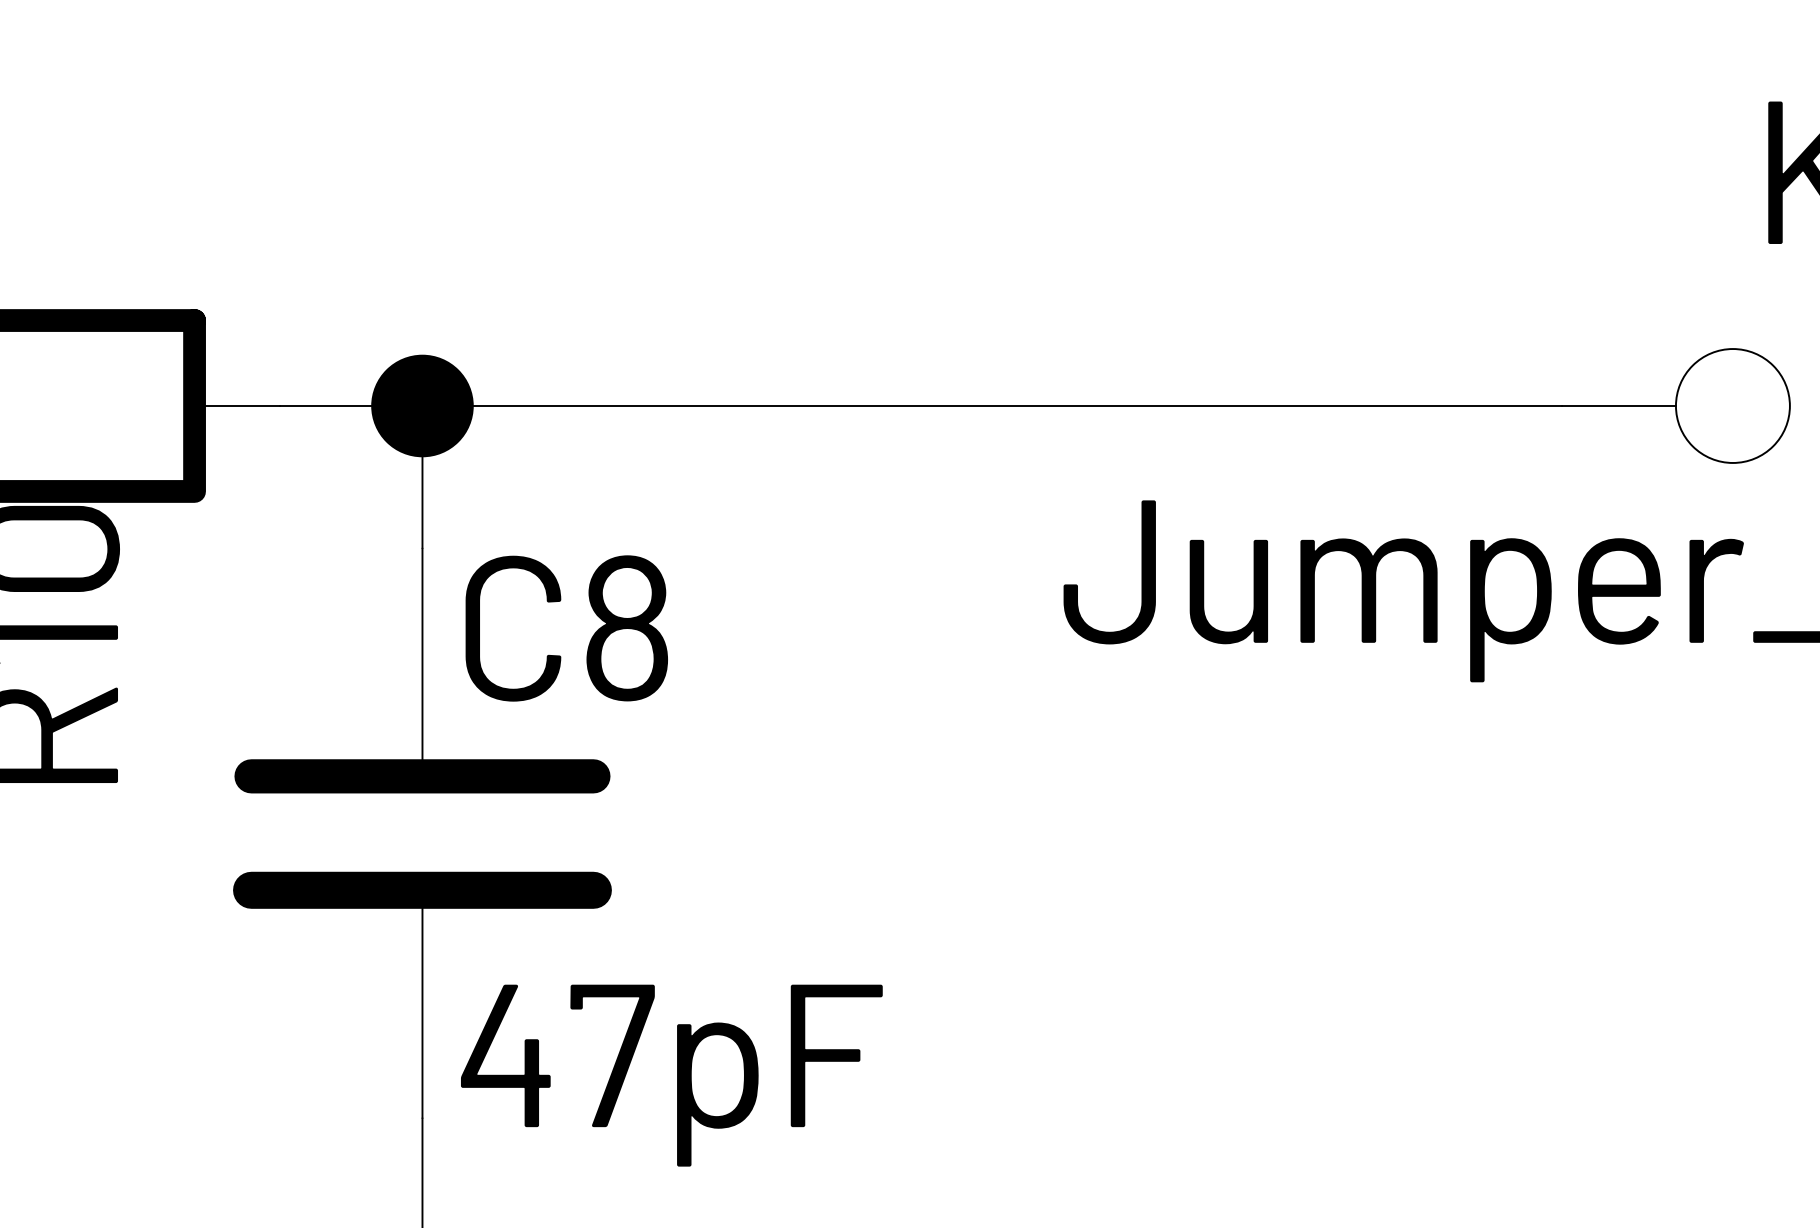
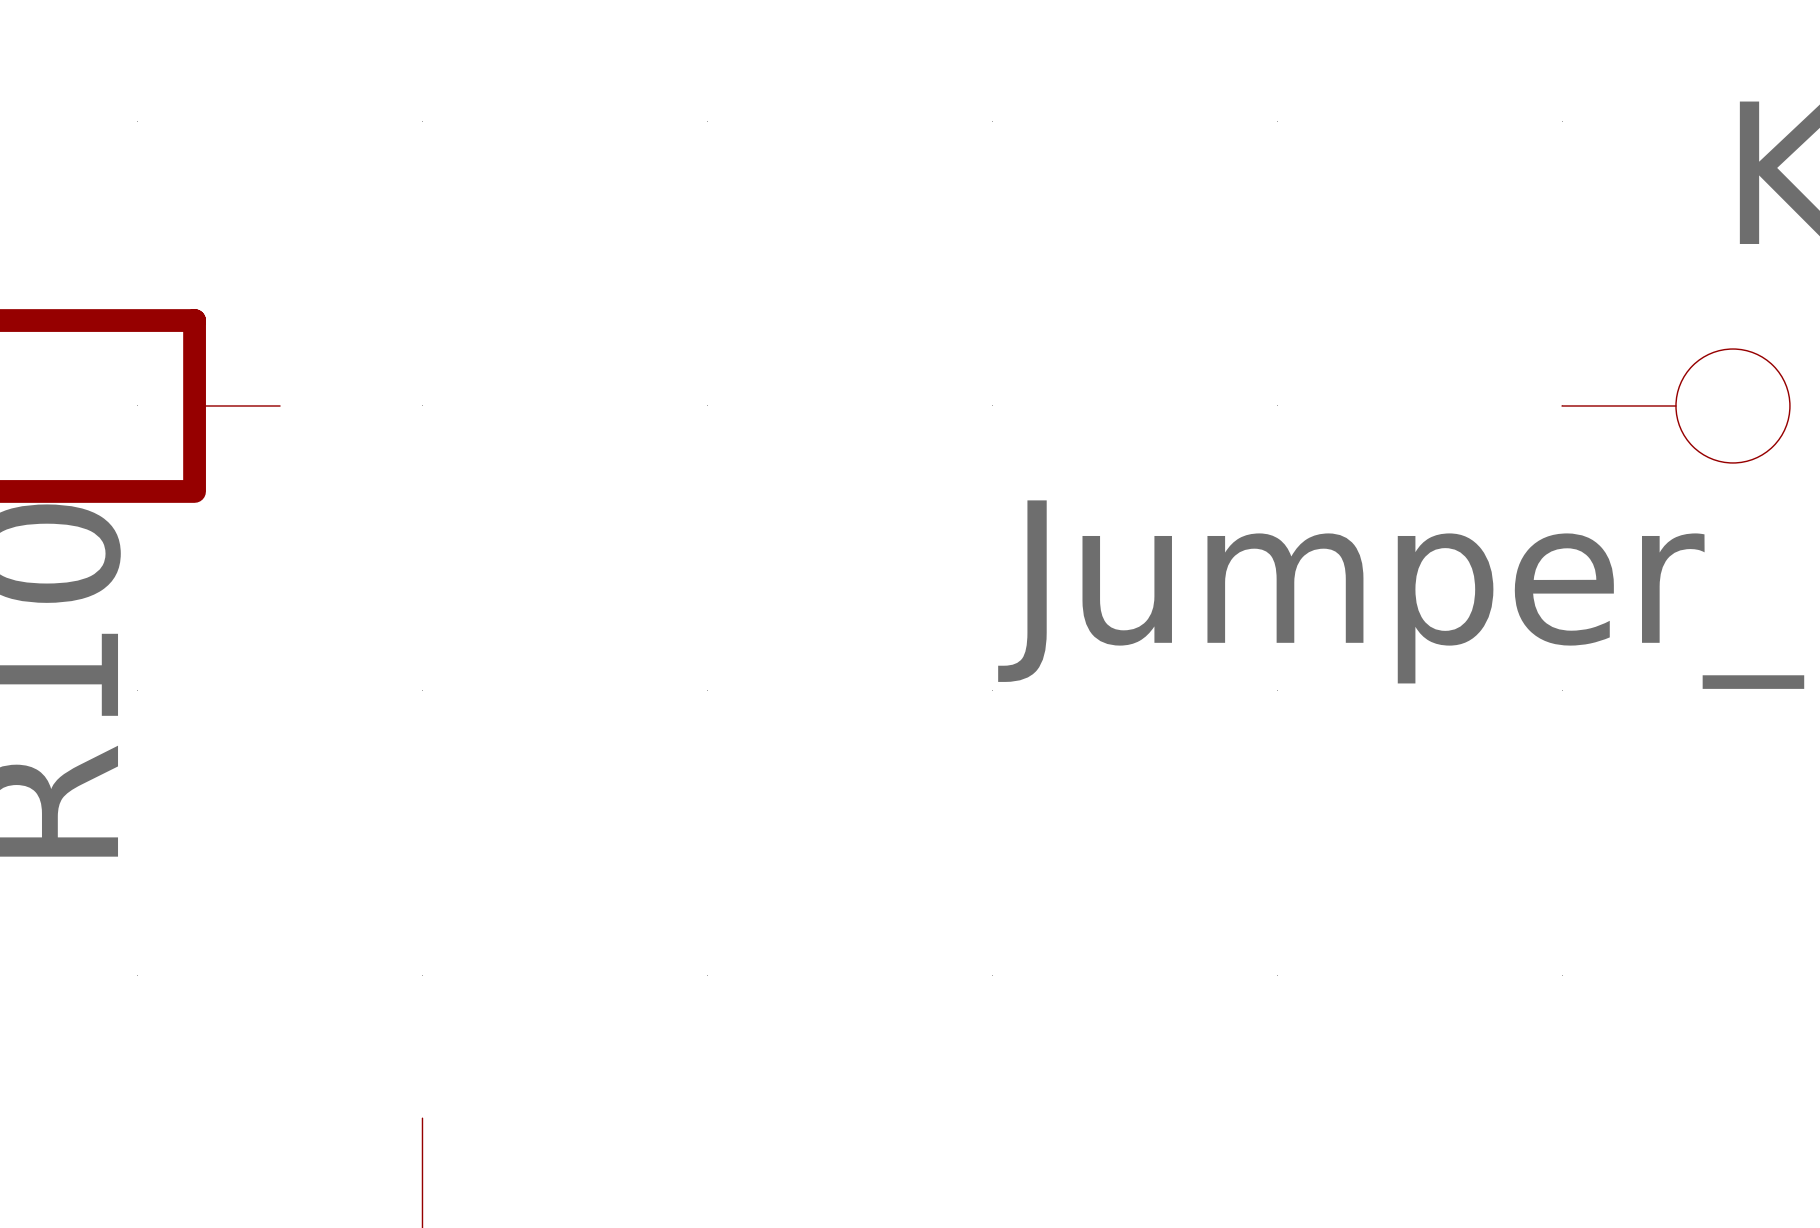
wire: (280, 405) (1562, 405) -> none
wire: (422, 405) (422, 548) -> none
junction: (422, 405) -> none
C8: 47pF (422, 833) -> none

